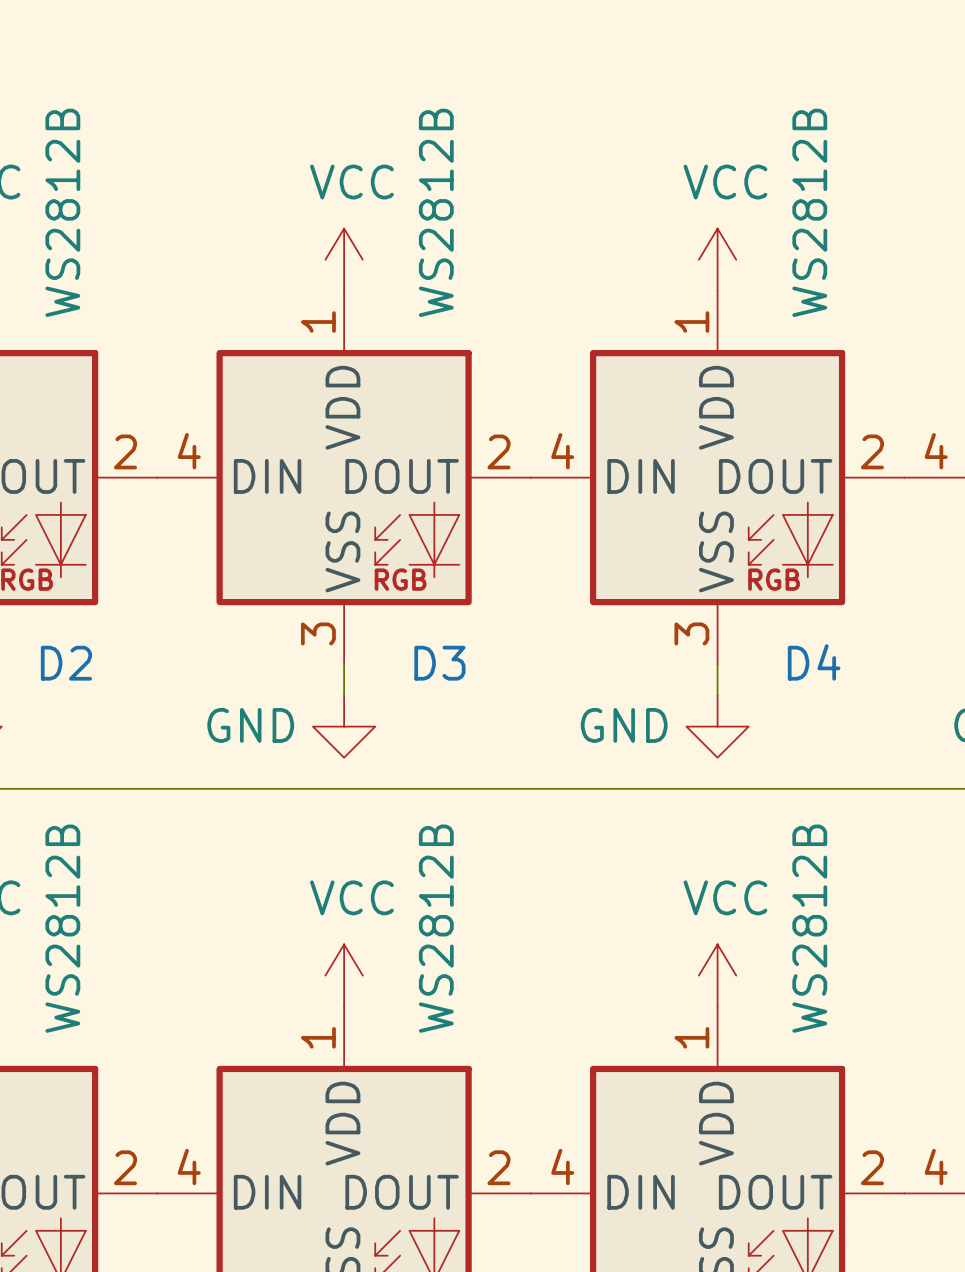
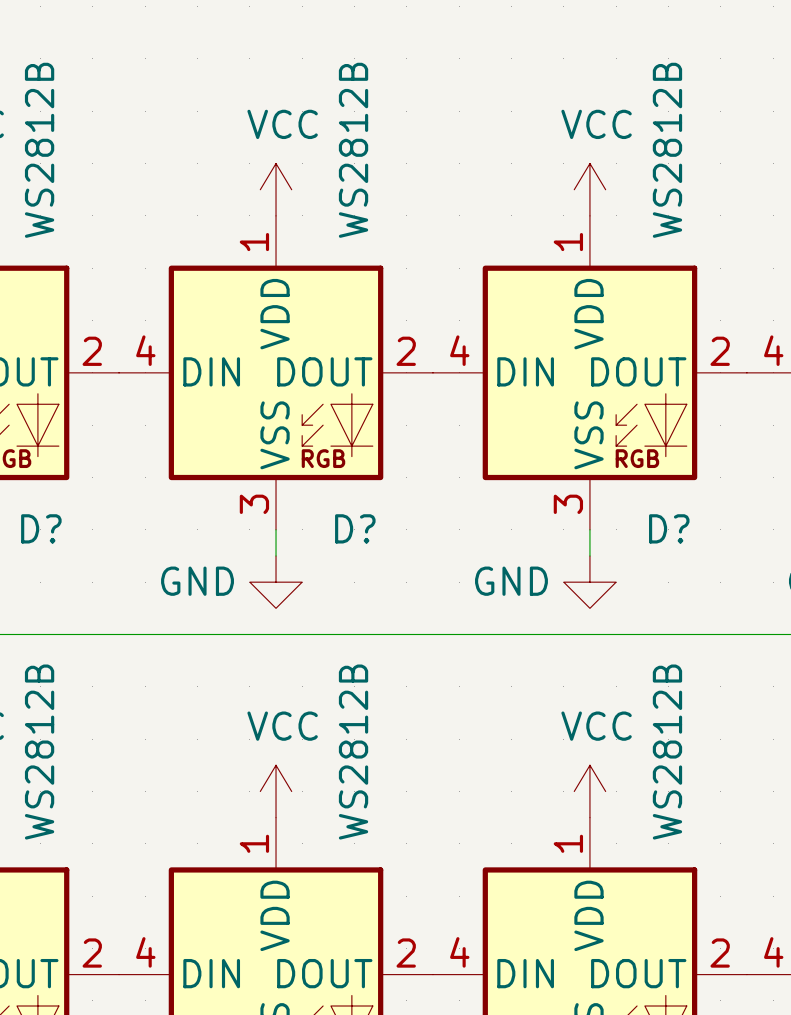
D4 name: D4 (814, 662) -> D? (669, 528)
D2 name: D2 (66, 663) -> D? (41, 528)
D3 name: D3 (439, 663) -> D? (355, 528)

